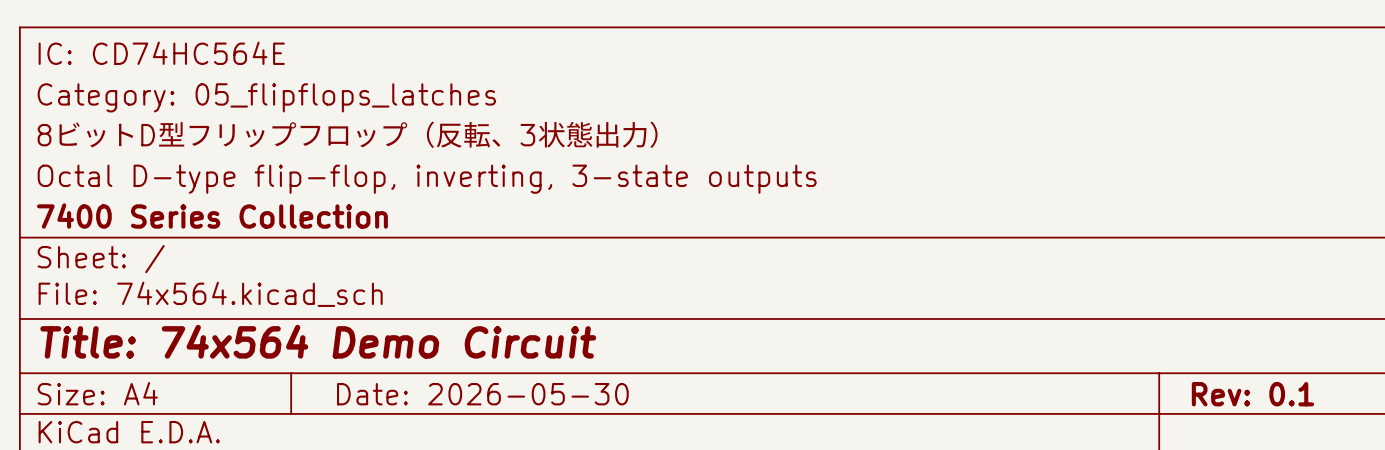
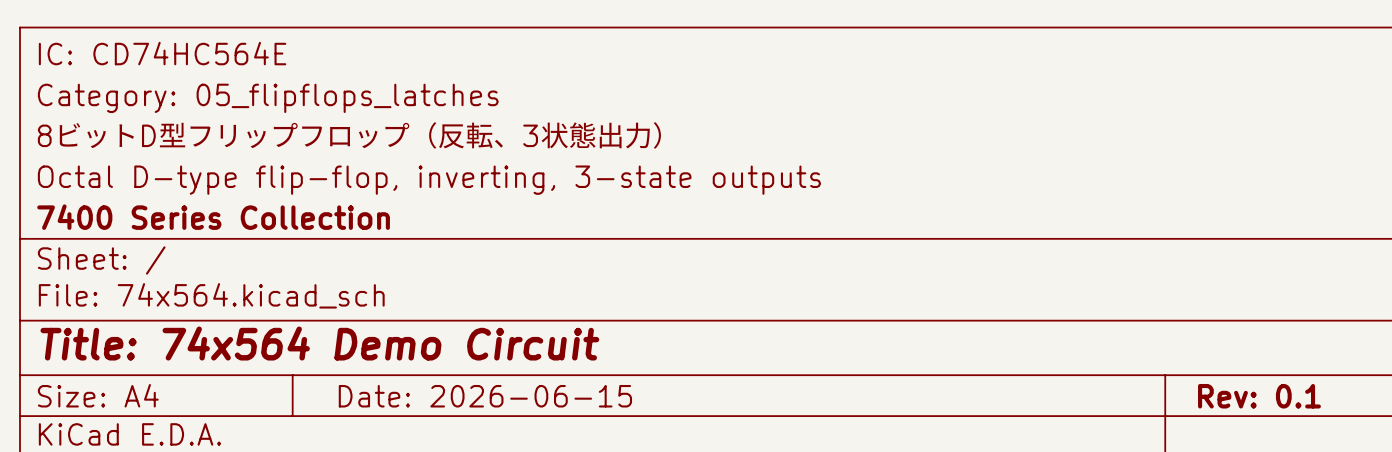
title block: Date: 2026-05-30 (482, 394) -> Date: 2026-06-15 (485, 396)

